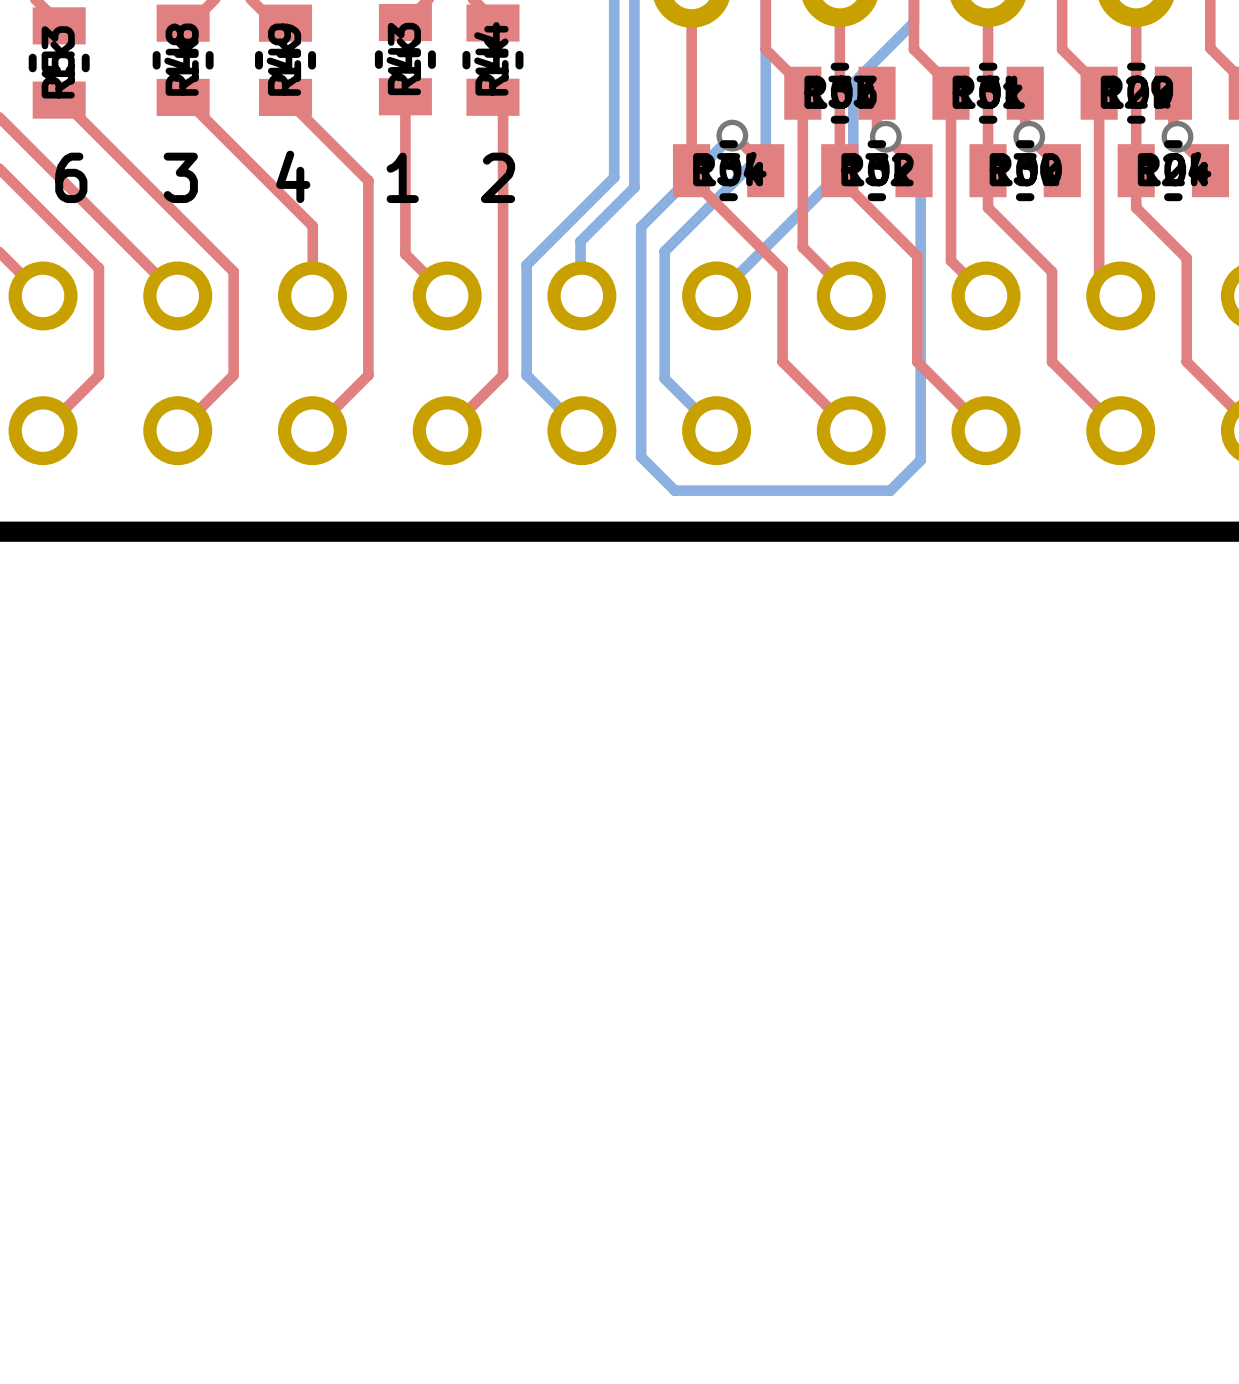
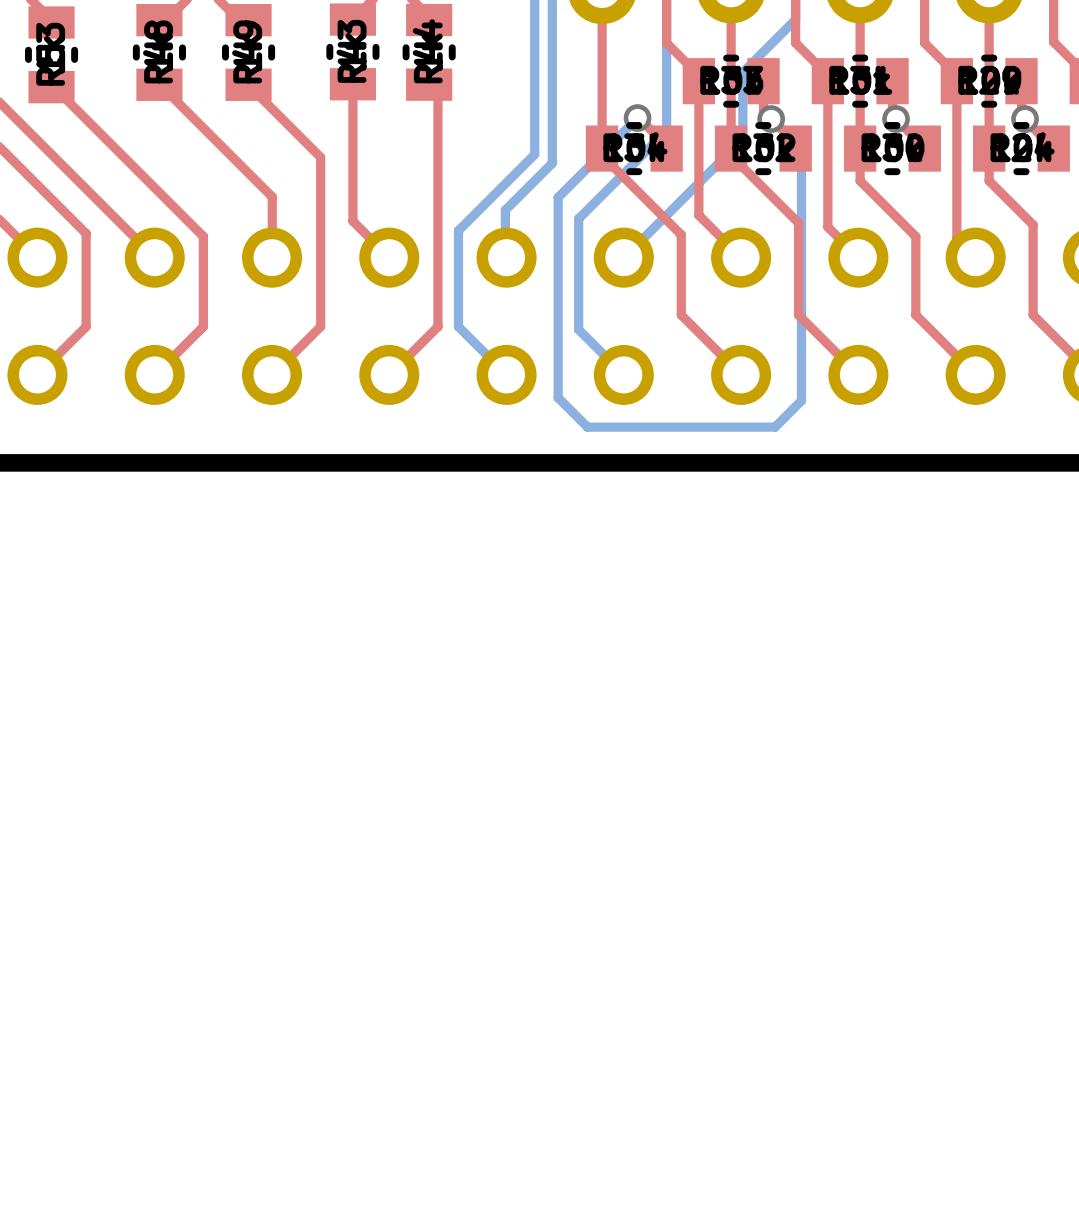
text: 4 (293, 176) -> none
text: 6 (71, 177) -> none
text: 3 (180, 177) -> none
text: 1 (402, 177) -> none
text: 2 (498, 177) -> none

